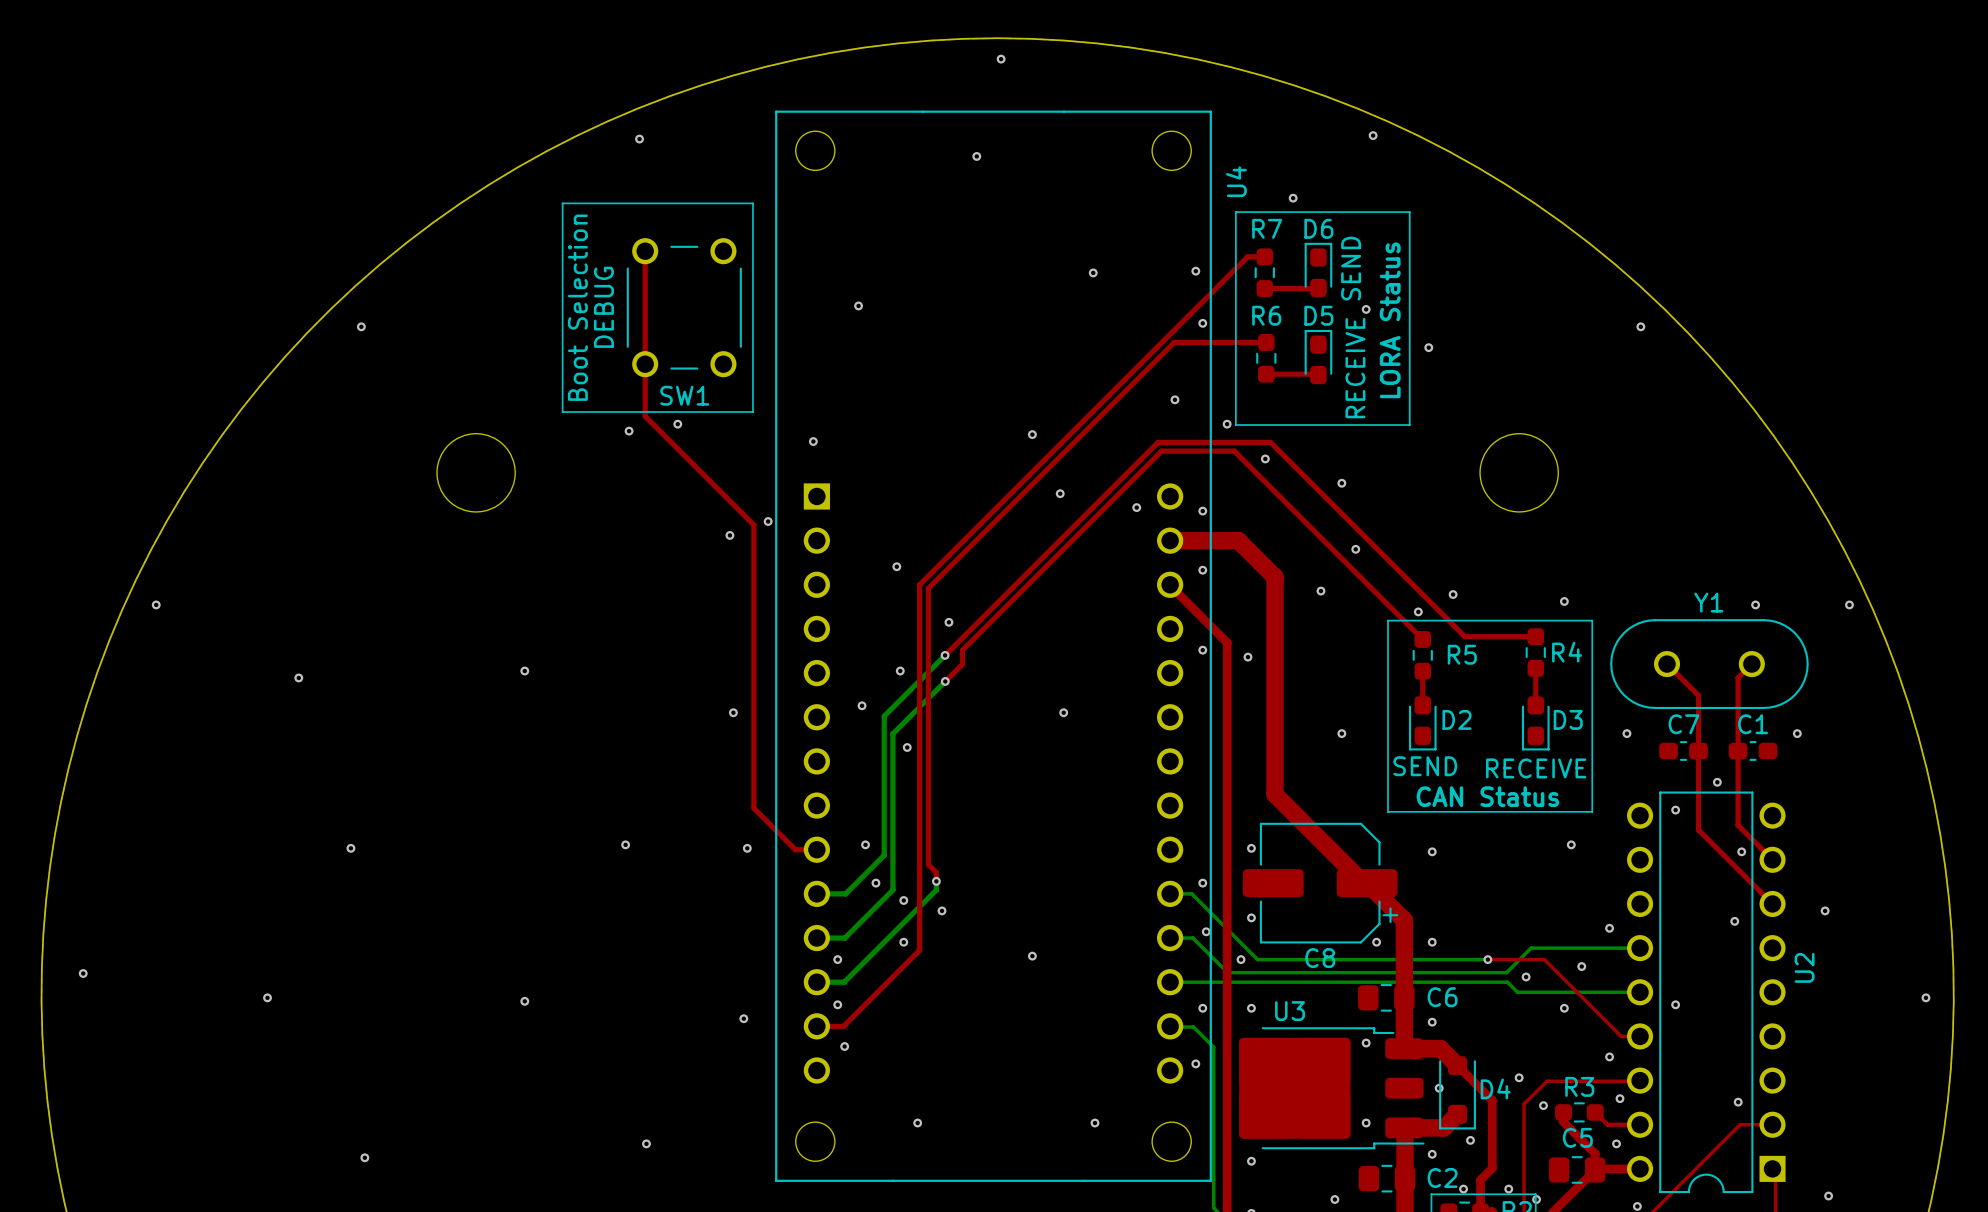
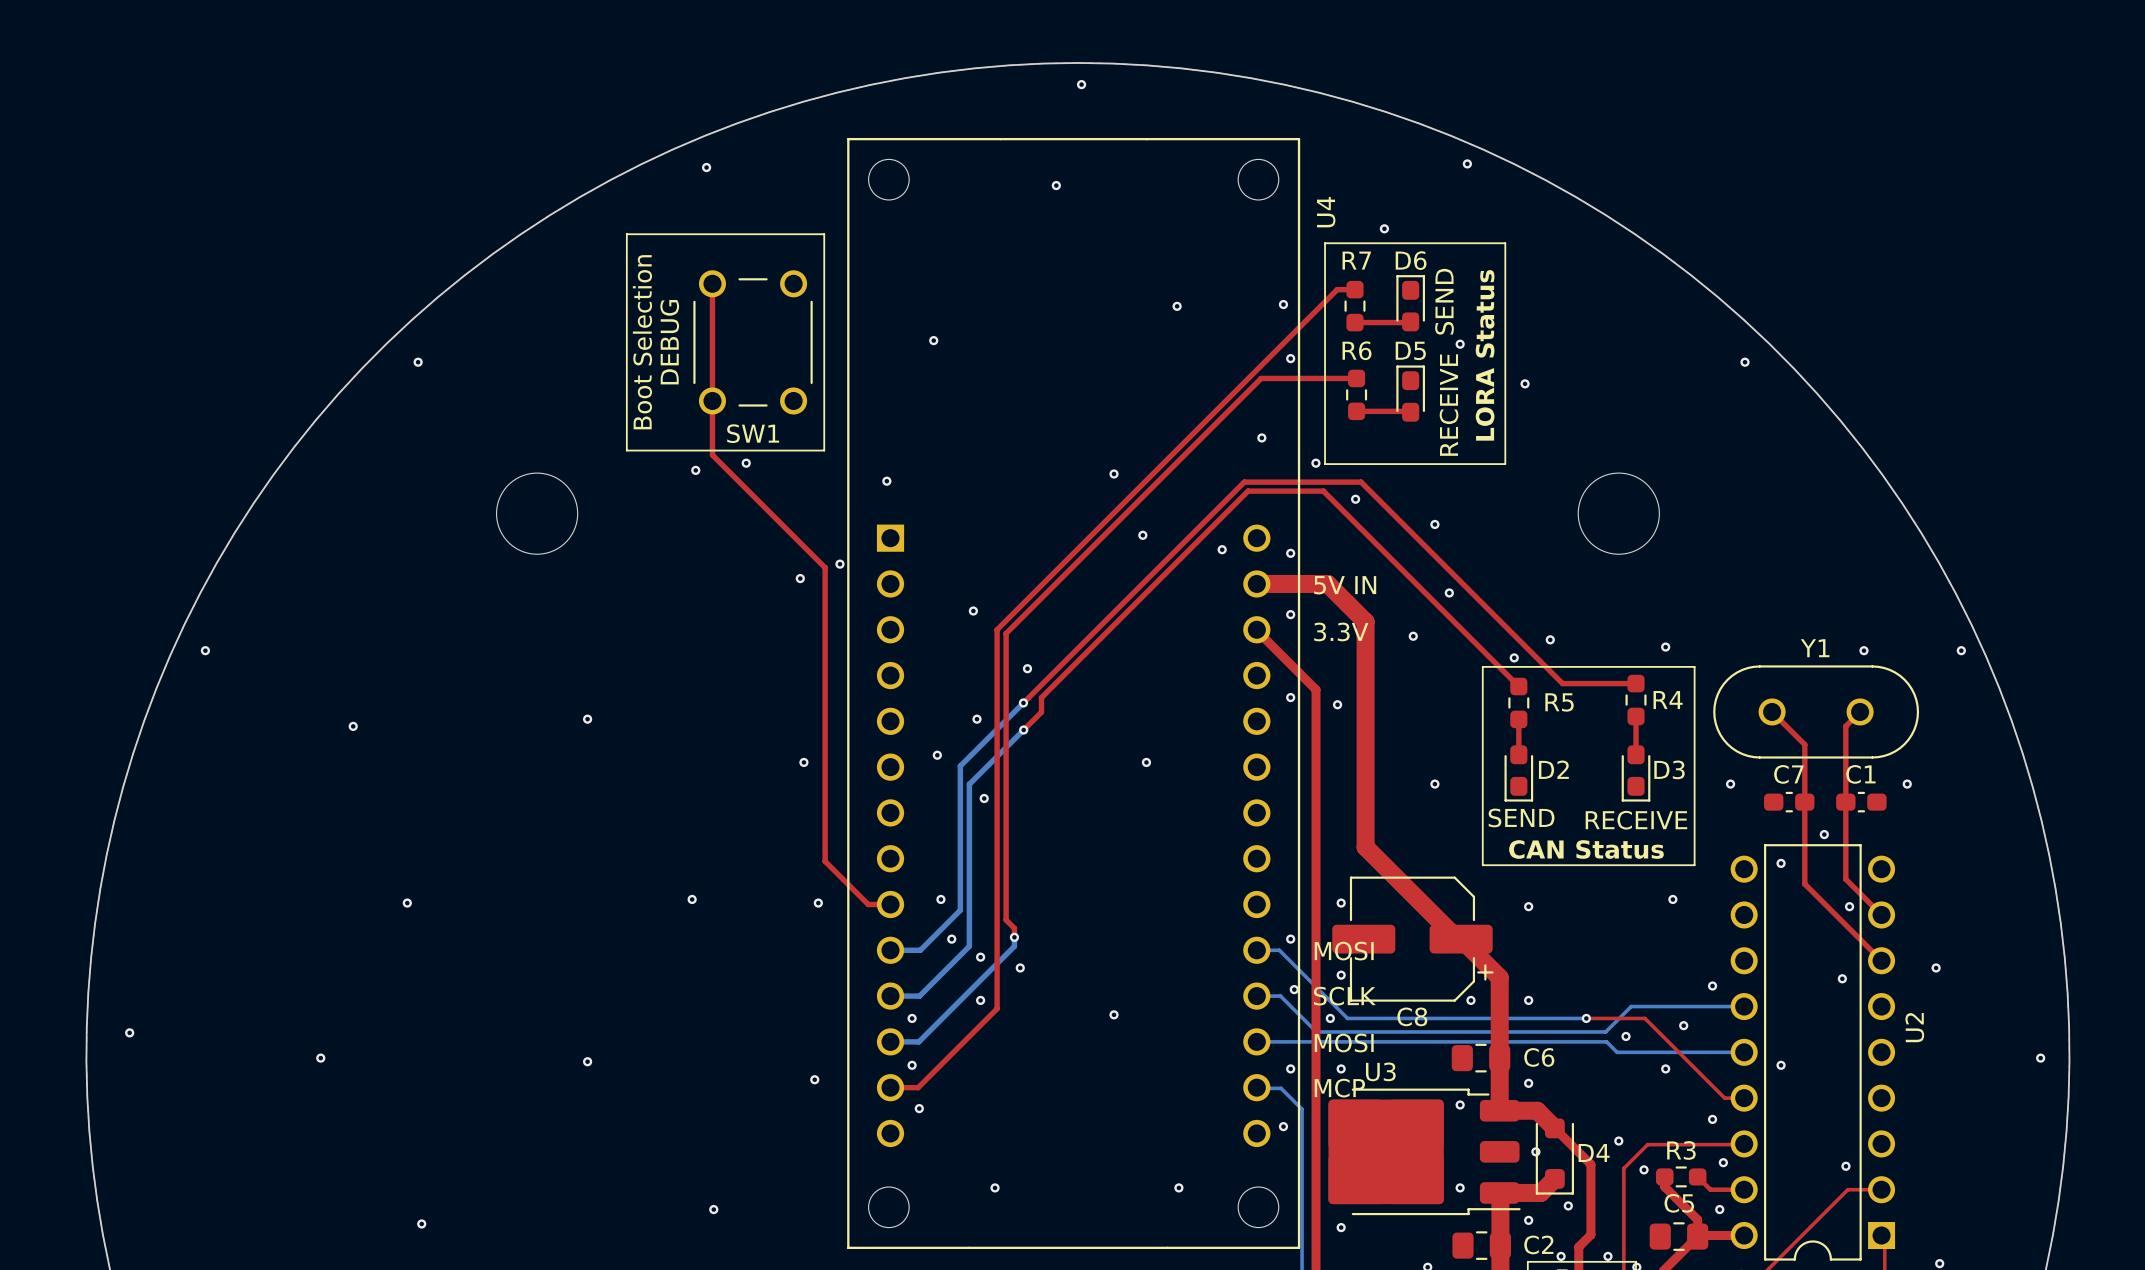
text: none -> 5V IN (1345, 585)
text: none -> 3.3V (1341, 631)
text: none -> MOSI (1344, 951)
text: none -> SCLK (1344, 996)
text: none -> MOSI (1344, 1043)
text: none -> MCP (1339, 1088)

